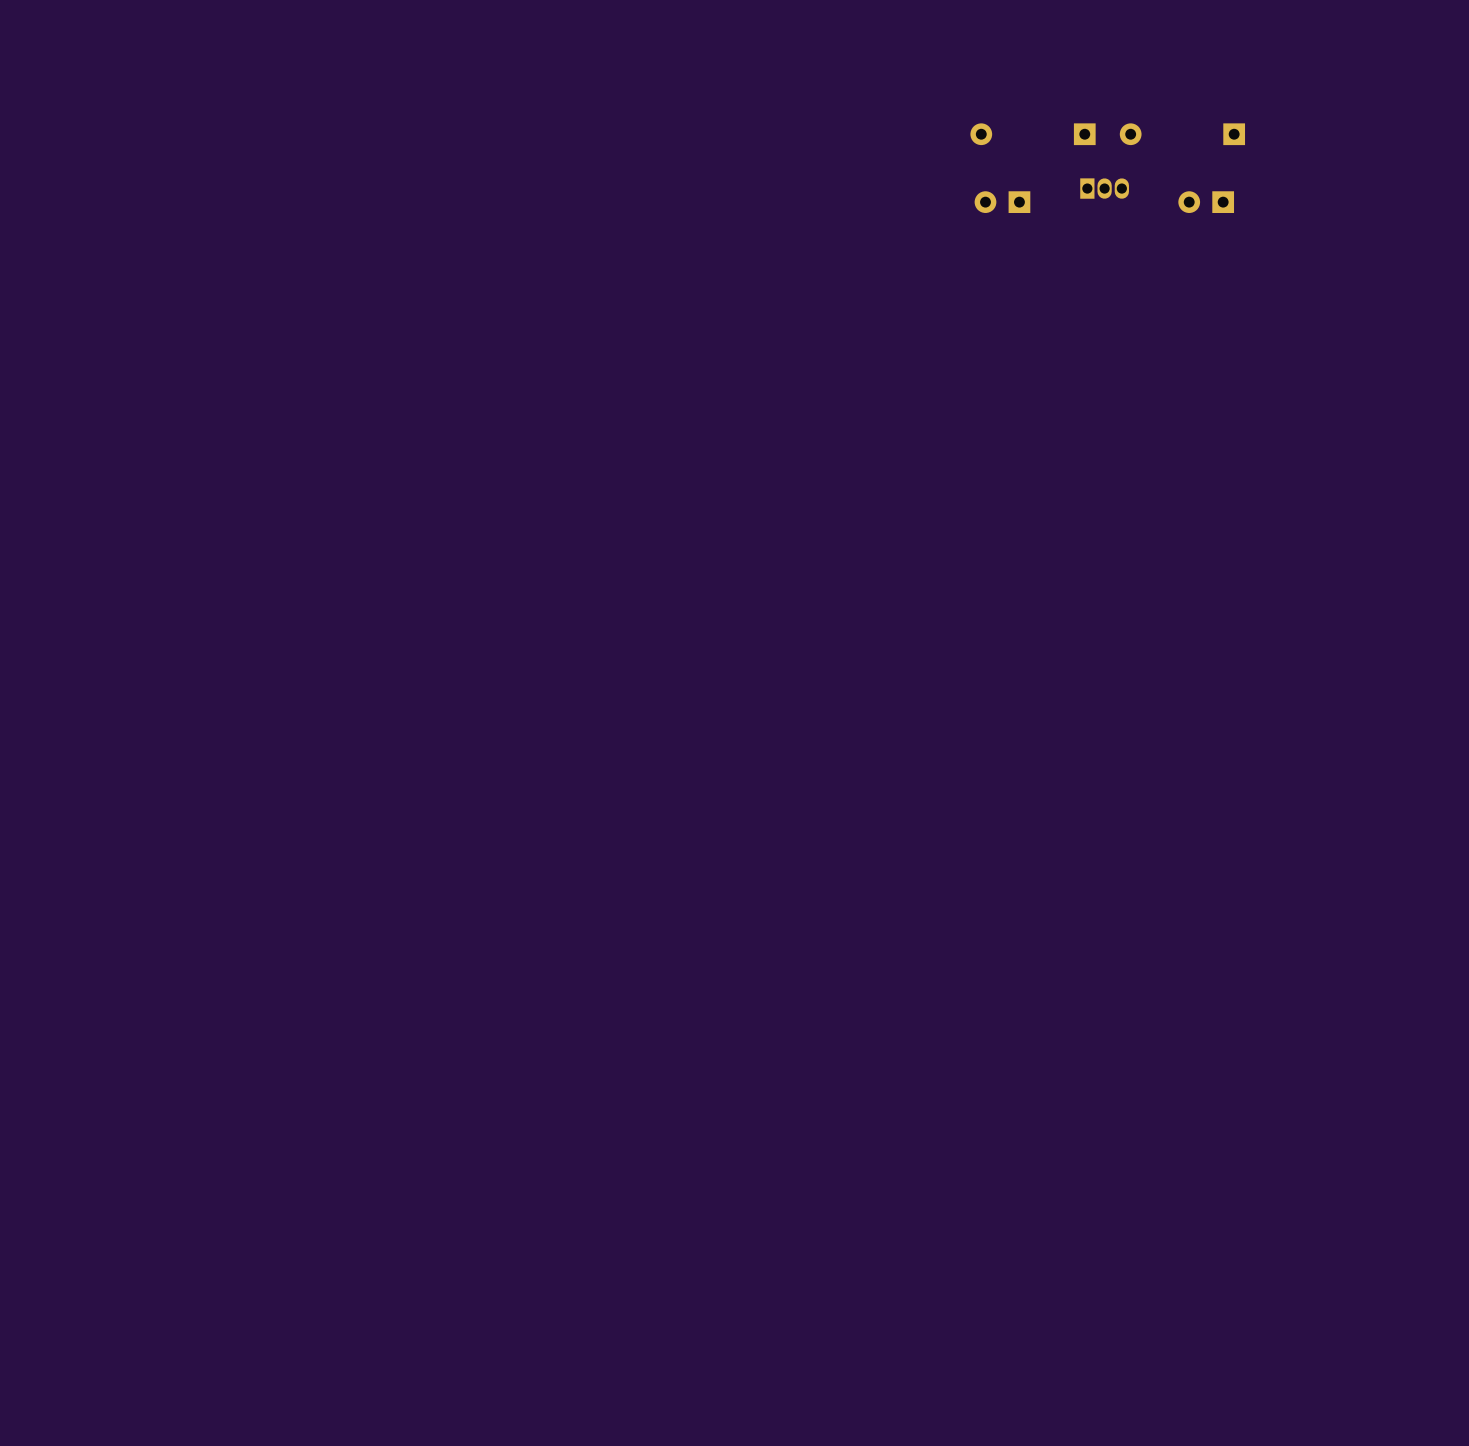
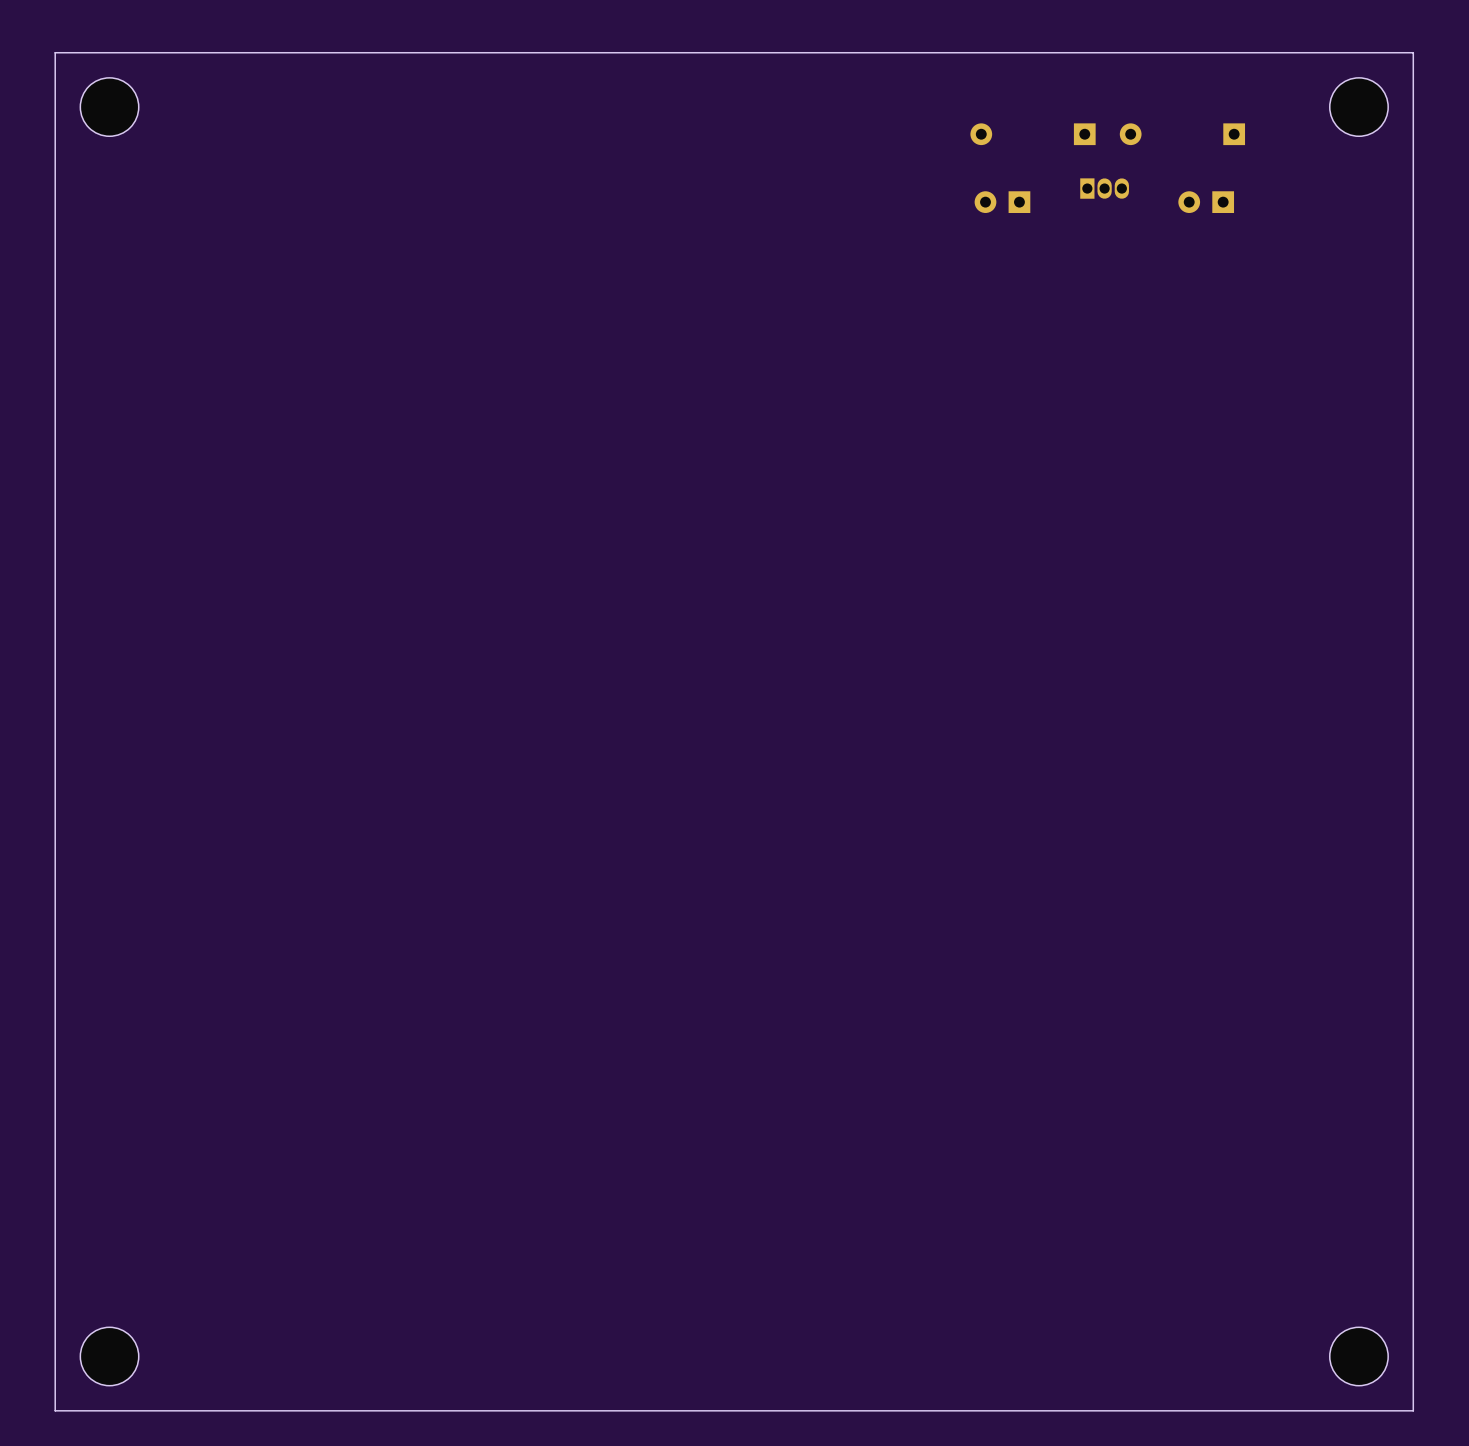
board edge: none -> (1413, 52) (1413, 1410) (55, 1410) (55, 52) (1413, 52)
part: none -> (109, 107)
part: none -> (1358, 107)
part: none -> (109, 1356)
part: none -> (1358, 1356)

